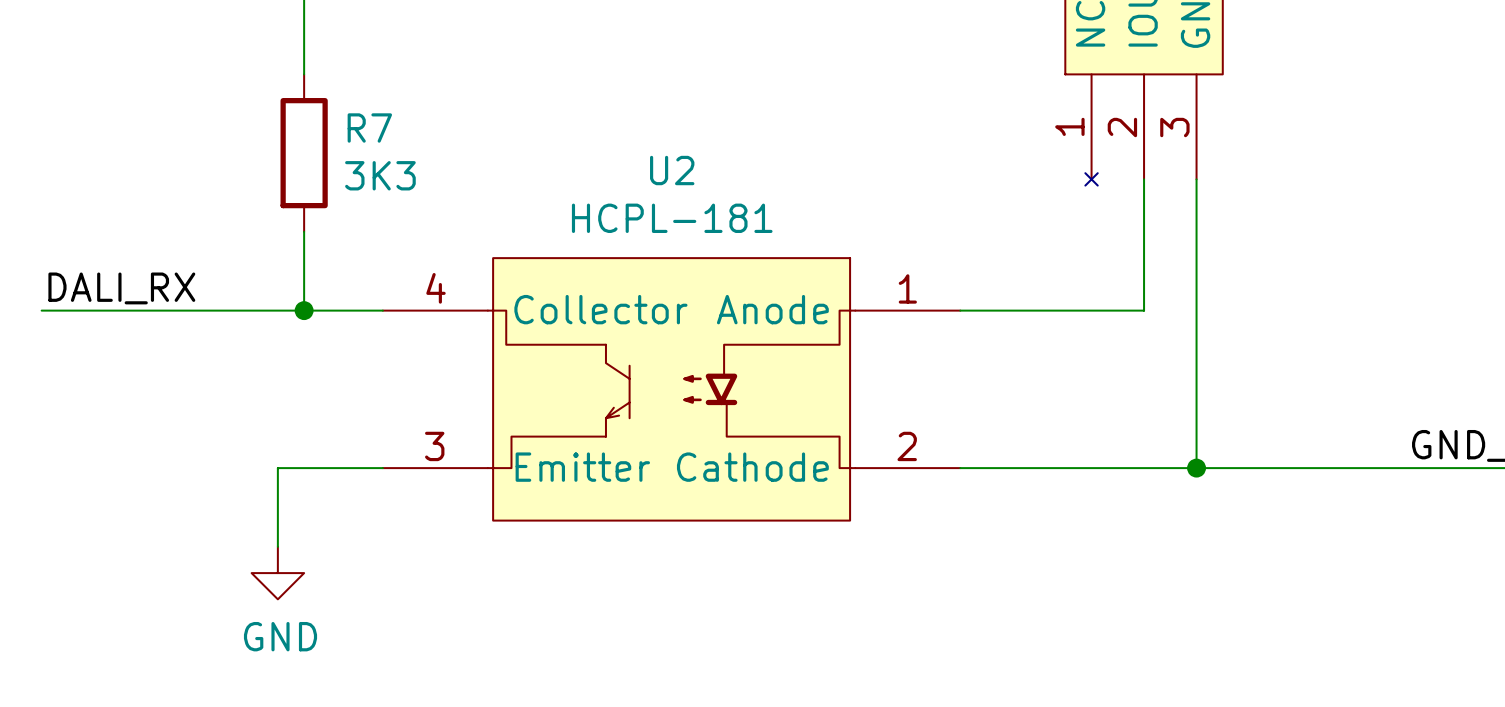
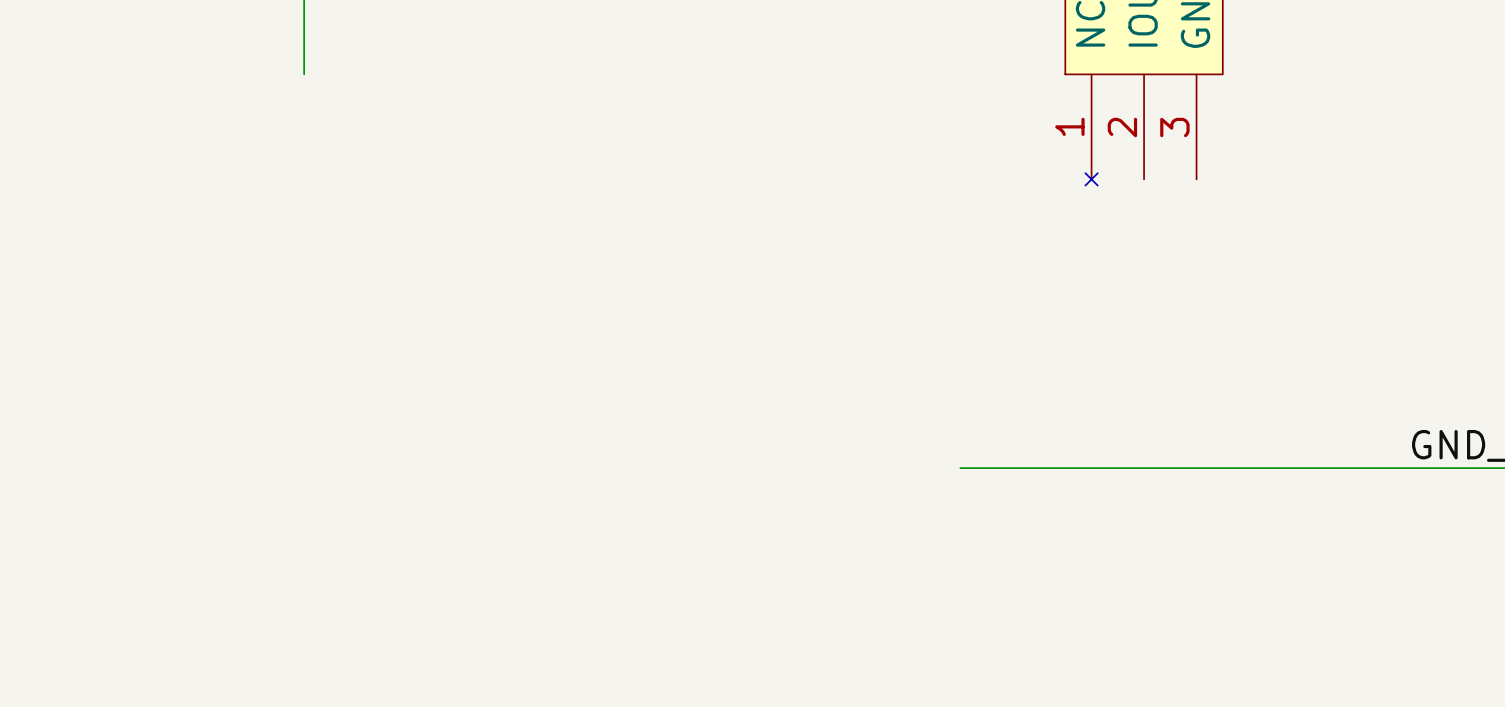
R7: 3K3 (304, 153) -> none
wire: (1144, 179) (1144, 310) (960, 310) -> none
wire: (1196, 179) (1196, 468) -> none
wire: (304, 231) (304, 310) -> none
label: DALI_RX (121, 288) -> none
wire: (41, 310) (382, 310) -> none
junction: (304, 310) -> none
U2: HCPL-181 (671, 389) -> none
wire: (382, 468) (277, 468) (277, 546) -> none
junction: (1196, 468) -> none
power symbol: GND (277, 573) -> none

